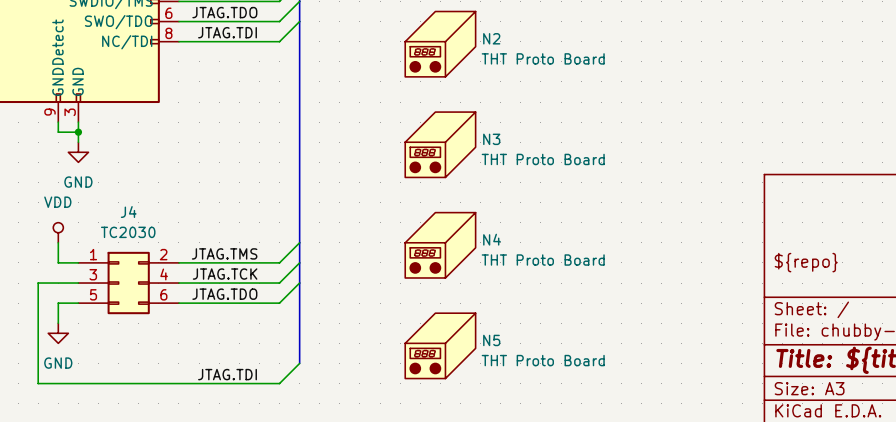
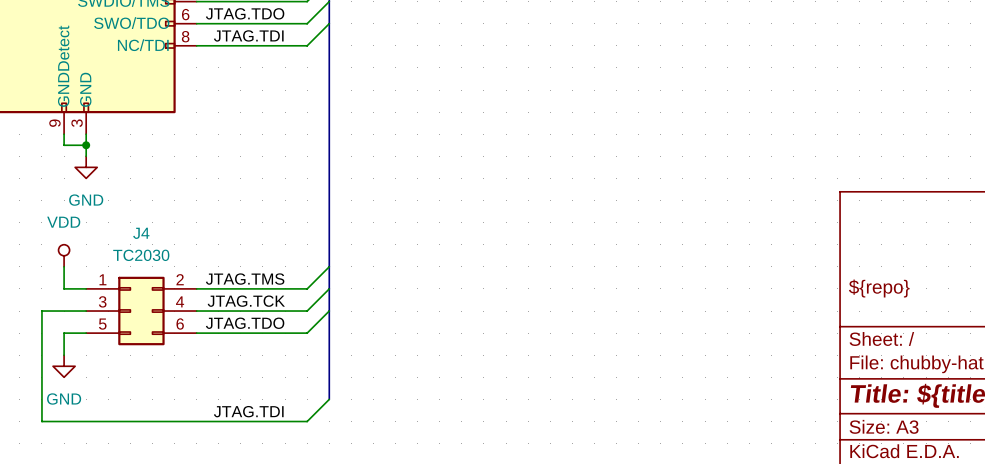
N2: THT Proto Board (440, 44) -> none
N3: THT Proto Board (440, 144) -> none
N4: THT Proto Board (440, 245) -> none
N5: THT Proto Board (440, 345) -> none

